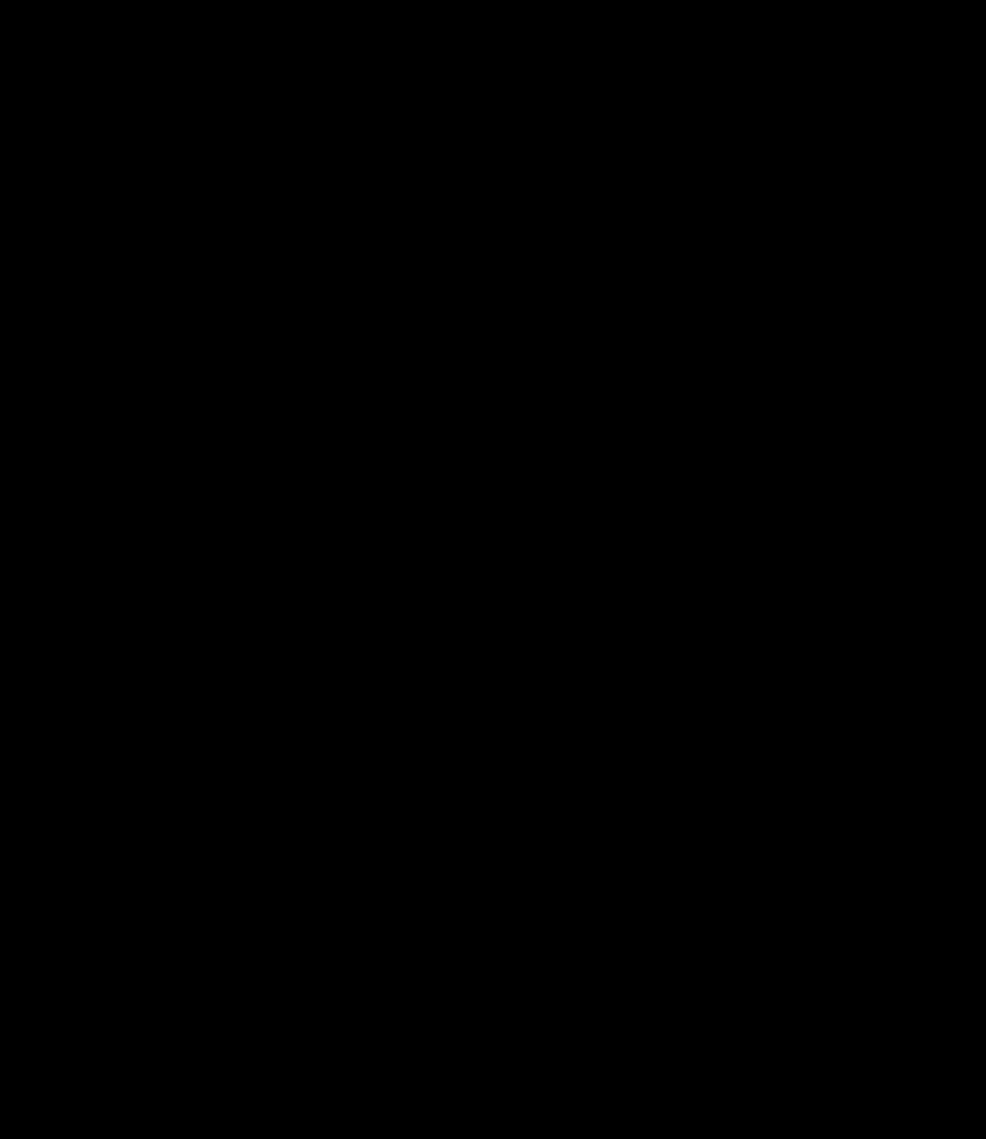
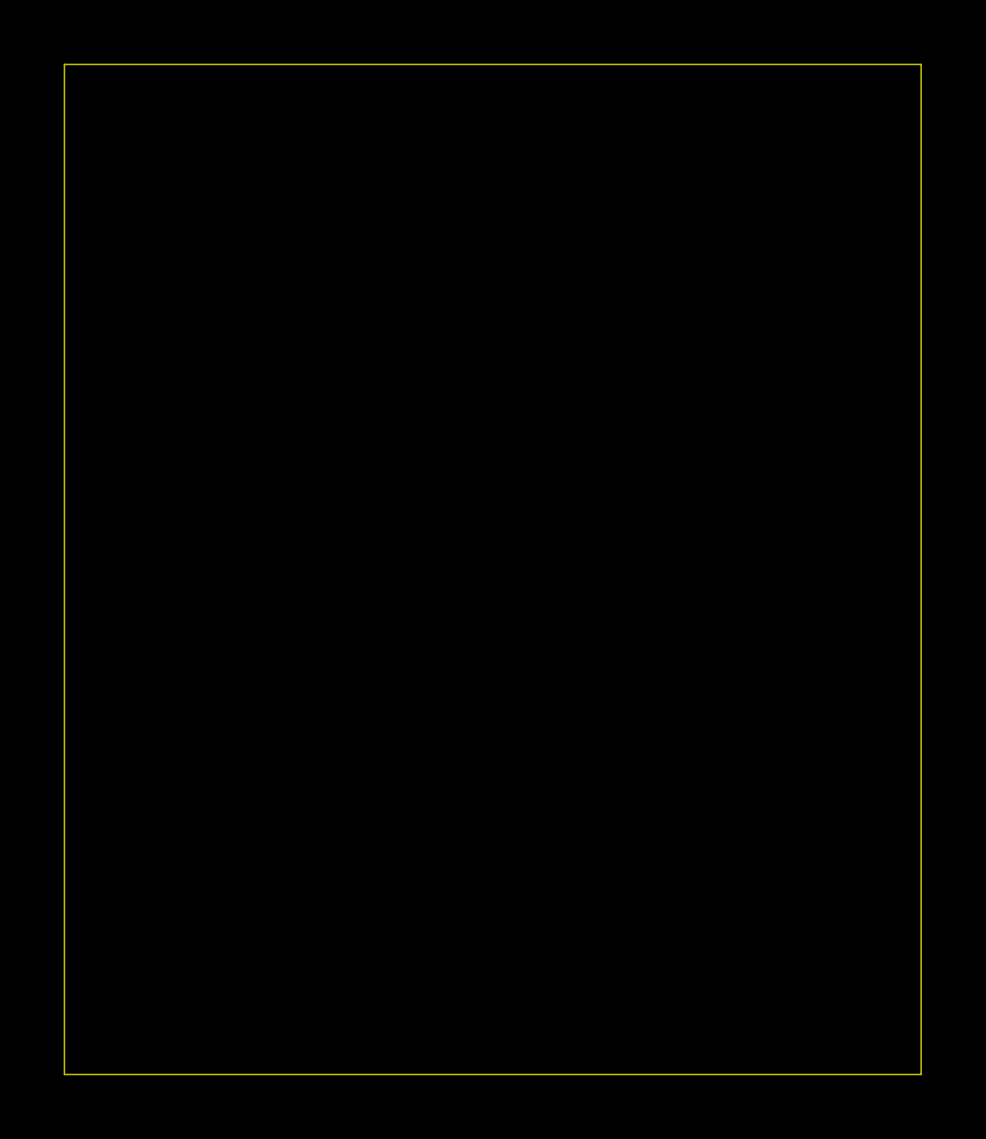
board edge: none -> (921, 64) (64, 64) (64, 1074) (921, 1074) (921, 64)

